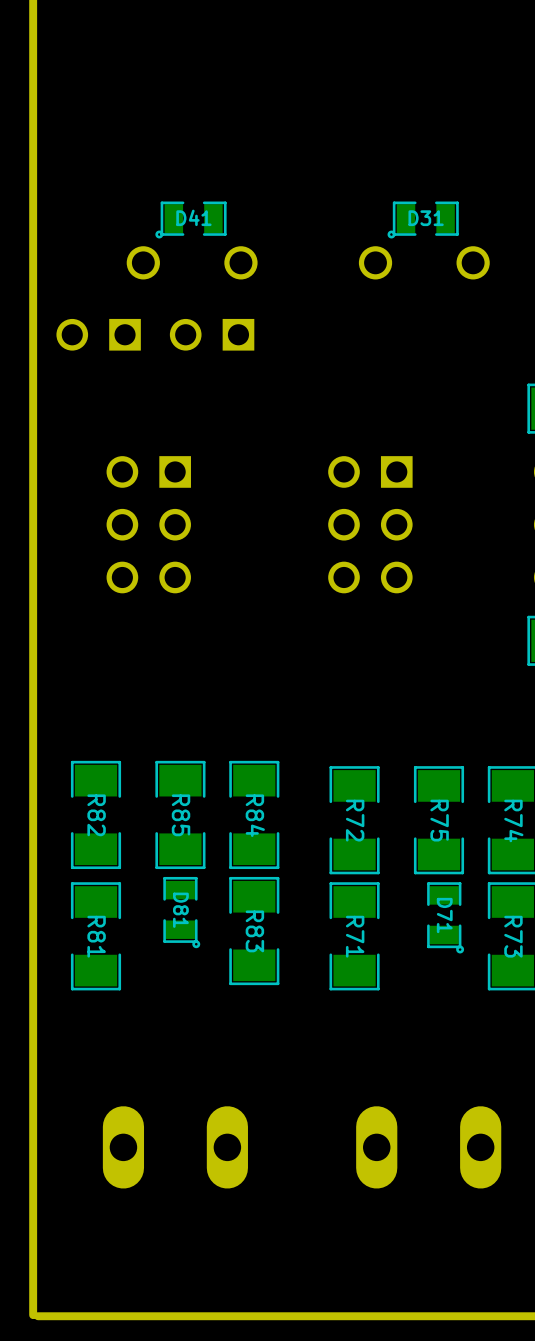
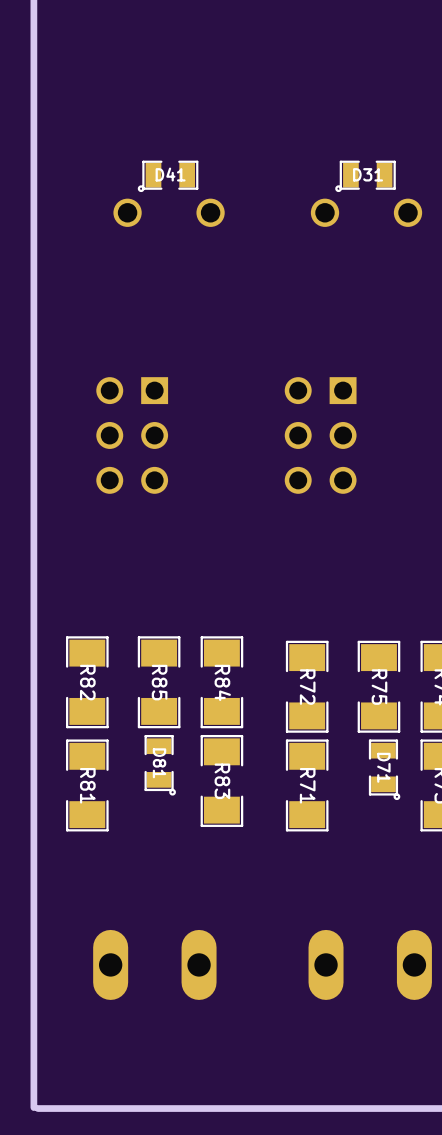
part: (98, 334) -> none
part: (212, 334) -> none

